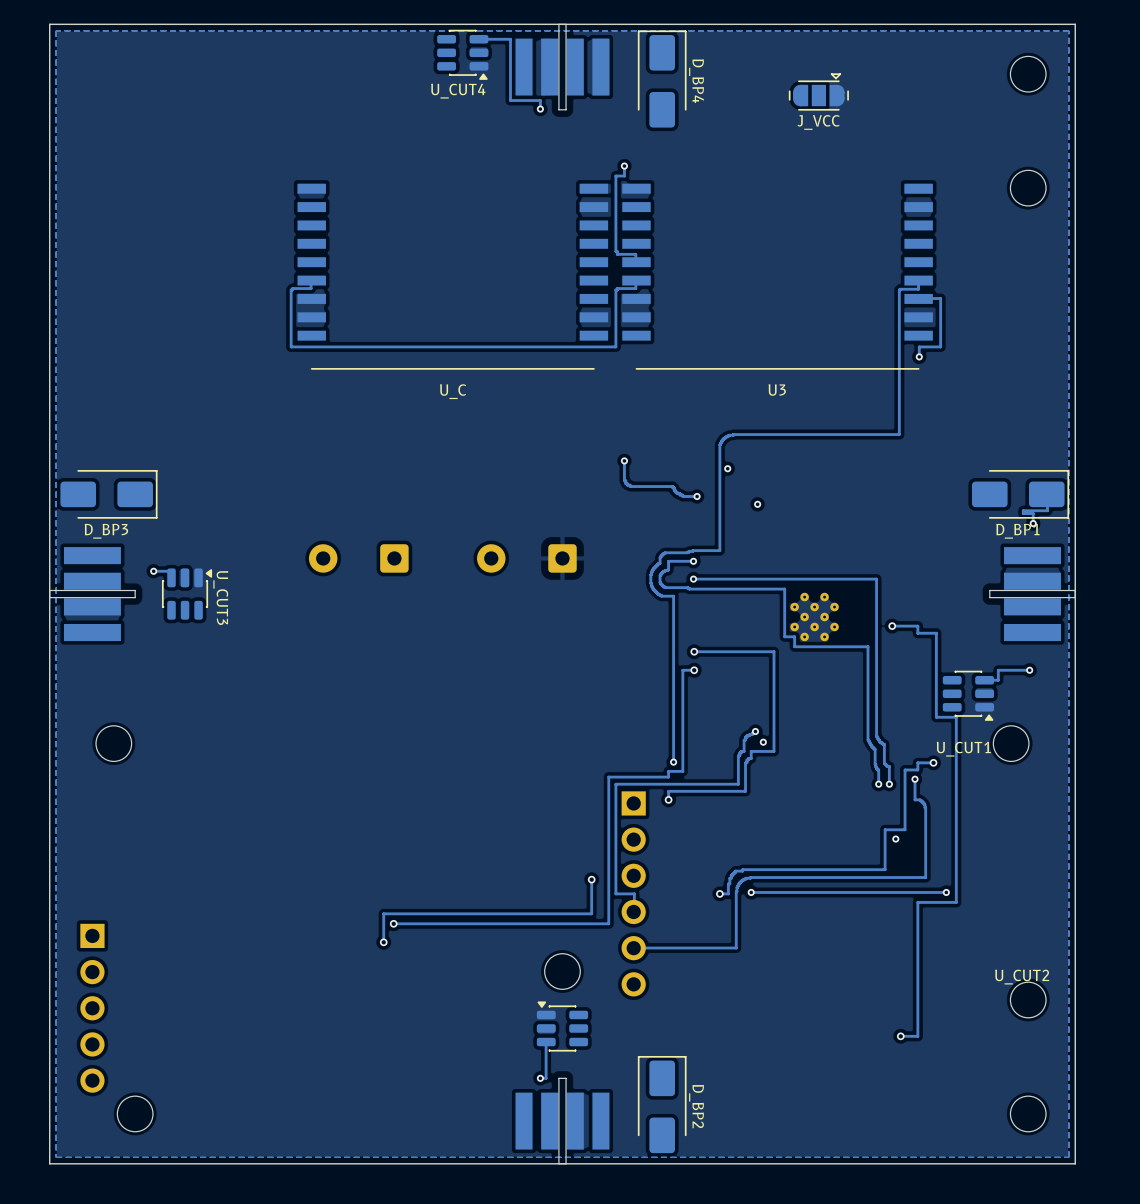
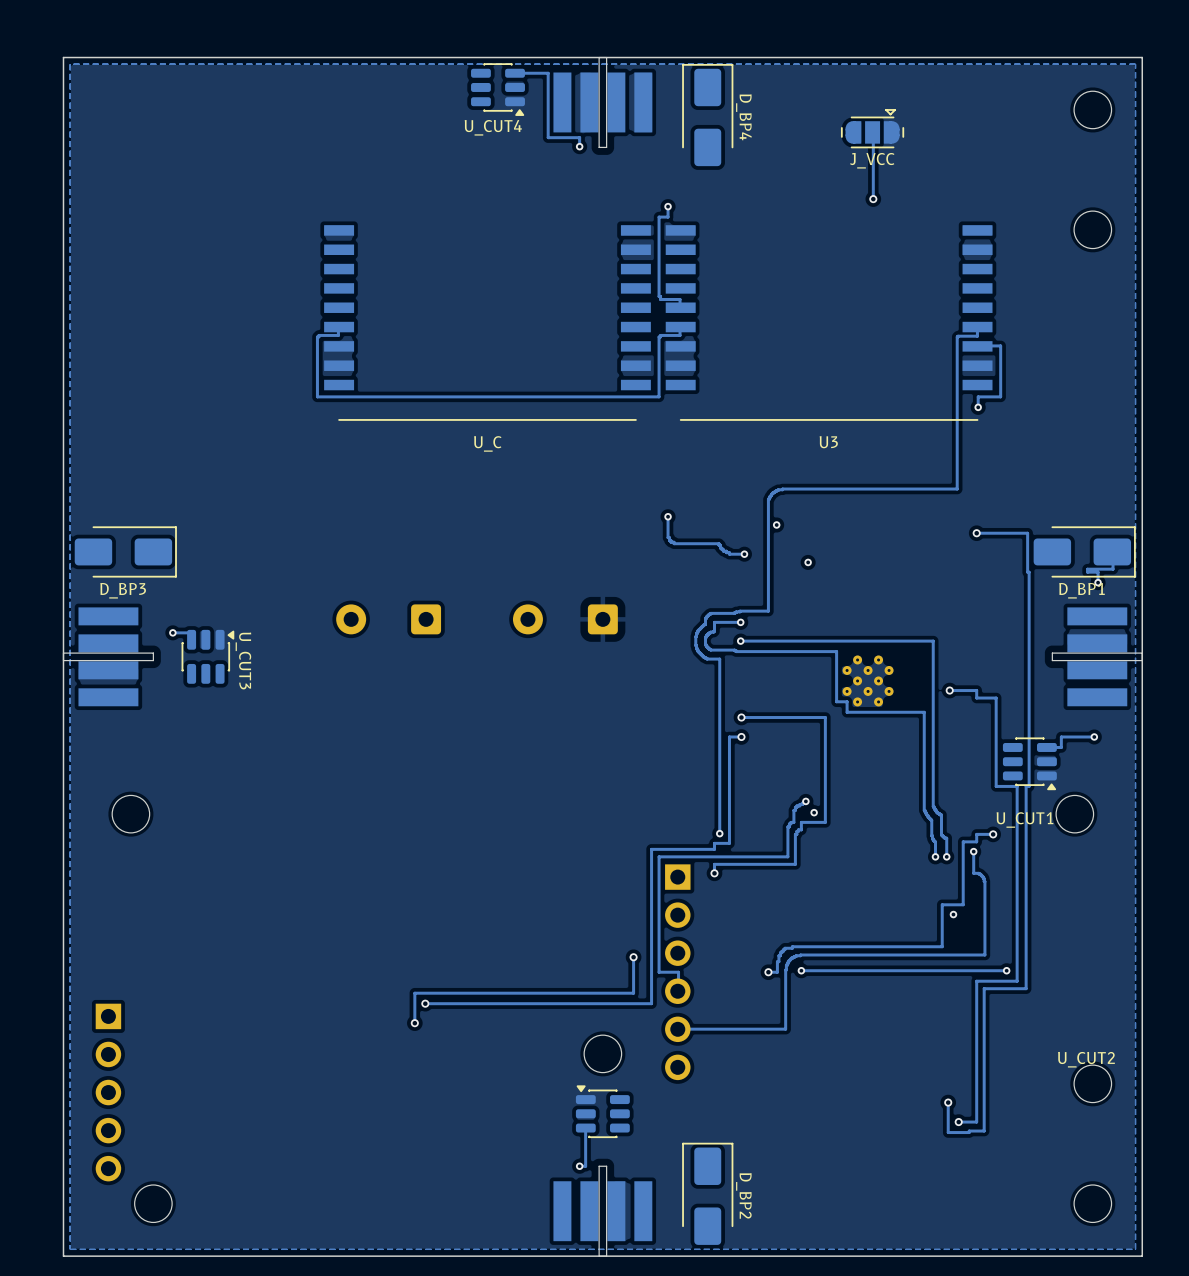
track: none -> (873, 131) (873, 199)
via: none -> (873, 199)
track: none -> (976, 533) (1027, 533) (1029, 786) (1026, 786) (1026, 988) (984, 988) (984, 1131) (948, 1132) (948, 1102)
via: none -> (976, 533)
via: none -> (948, 1102)

